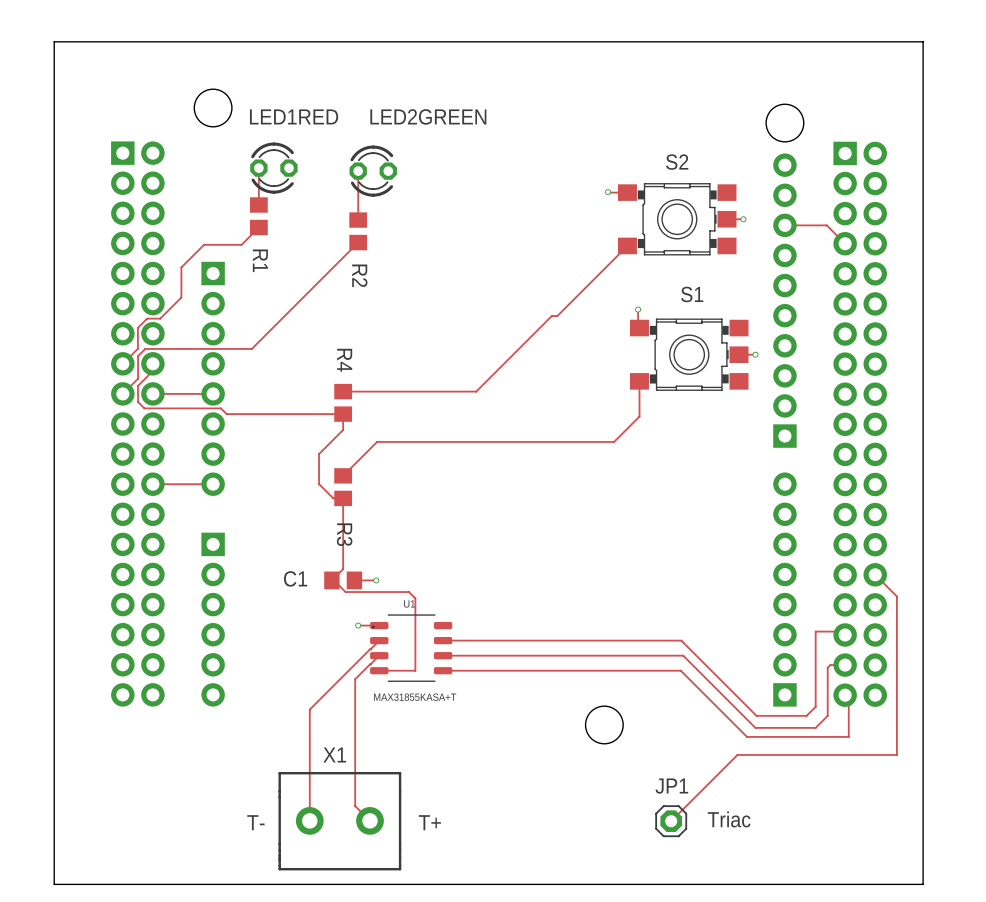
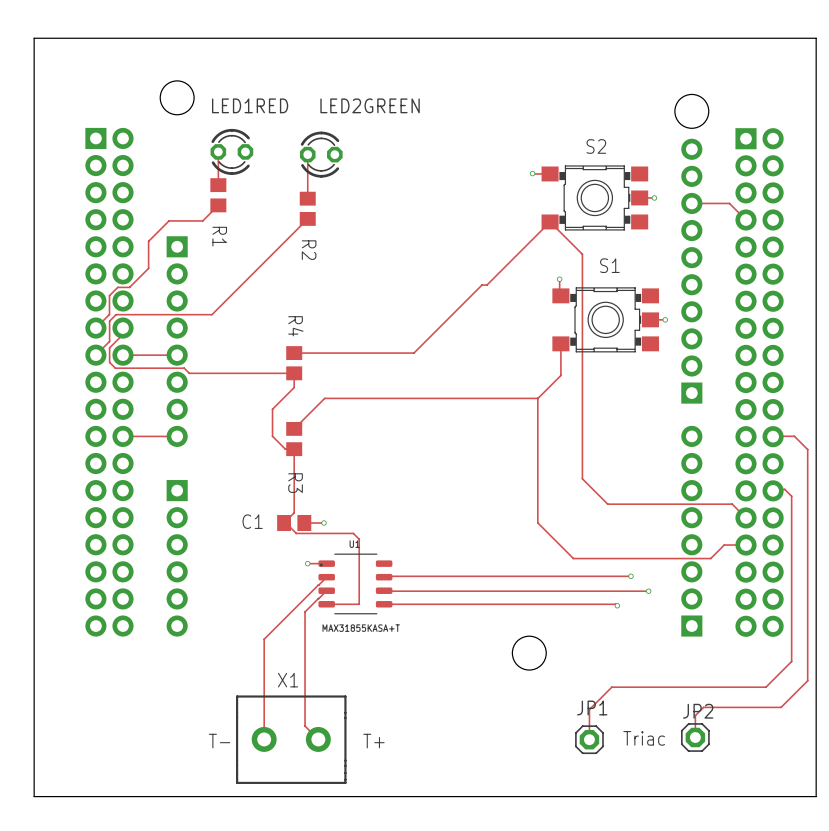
track: none -> (550, 221) (582, 254) (582, 478) (607, 504) (732, 504) (746, 517)
track: none -> (537, 398) (537, 522) (573, 558) (710, 558) (724, 545) (746, 545)
track: none -> (773, 436) (767, 438) (769, 436) (794, 436) (807, 449) (807, 680) (781, 707) (703, 707) (695, 715) (695, 737)
track: (875, 574) (896, 596) (896, 754) (737, 754) (671, 821) -> (773, 490) (784, 489) (791, 496) (791, 661) (765, 687) (611, 687) (589, 709) (589, 739)
track: (845, 634) (841, 631) (815, 631) (815, 706) (806, 715) (756, 715) (681, 640) (443, 640) -> (630, 576) (384, 577)
via: none -> (630, 576)
track: (443, 655) (683, 655) (755, 727) (815, 727) (827, 715) (827, 667) (830, 665) (845, 665) -> (384, 590) (648, 591)
via: none -> (648, 591)
track: (680, 670) (747, 736) (848, 736) (848, 698) (845, 695) -> (598, 604) (617, 605)
via: none -> (617, 605)
JP2: none -> (695, 737)

